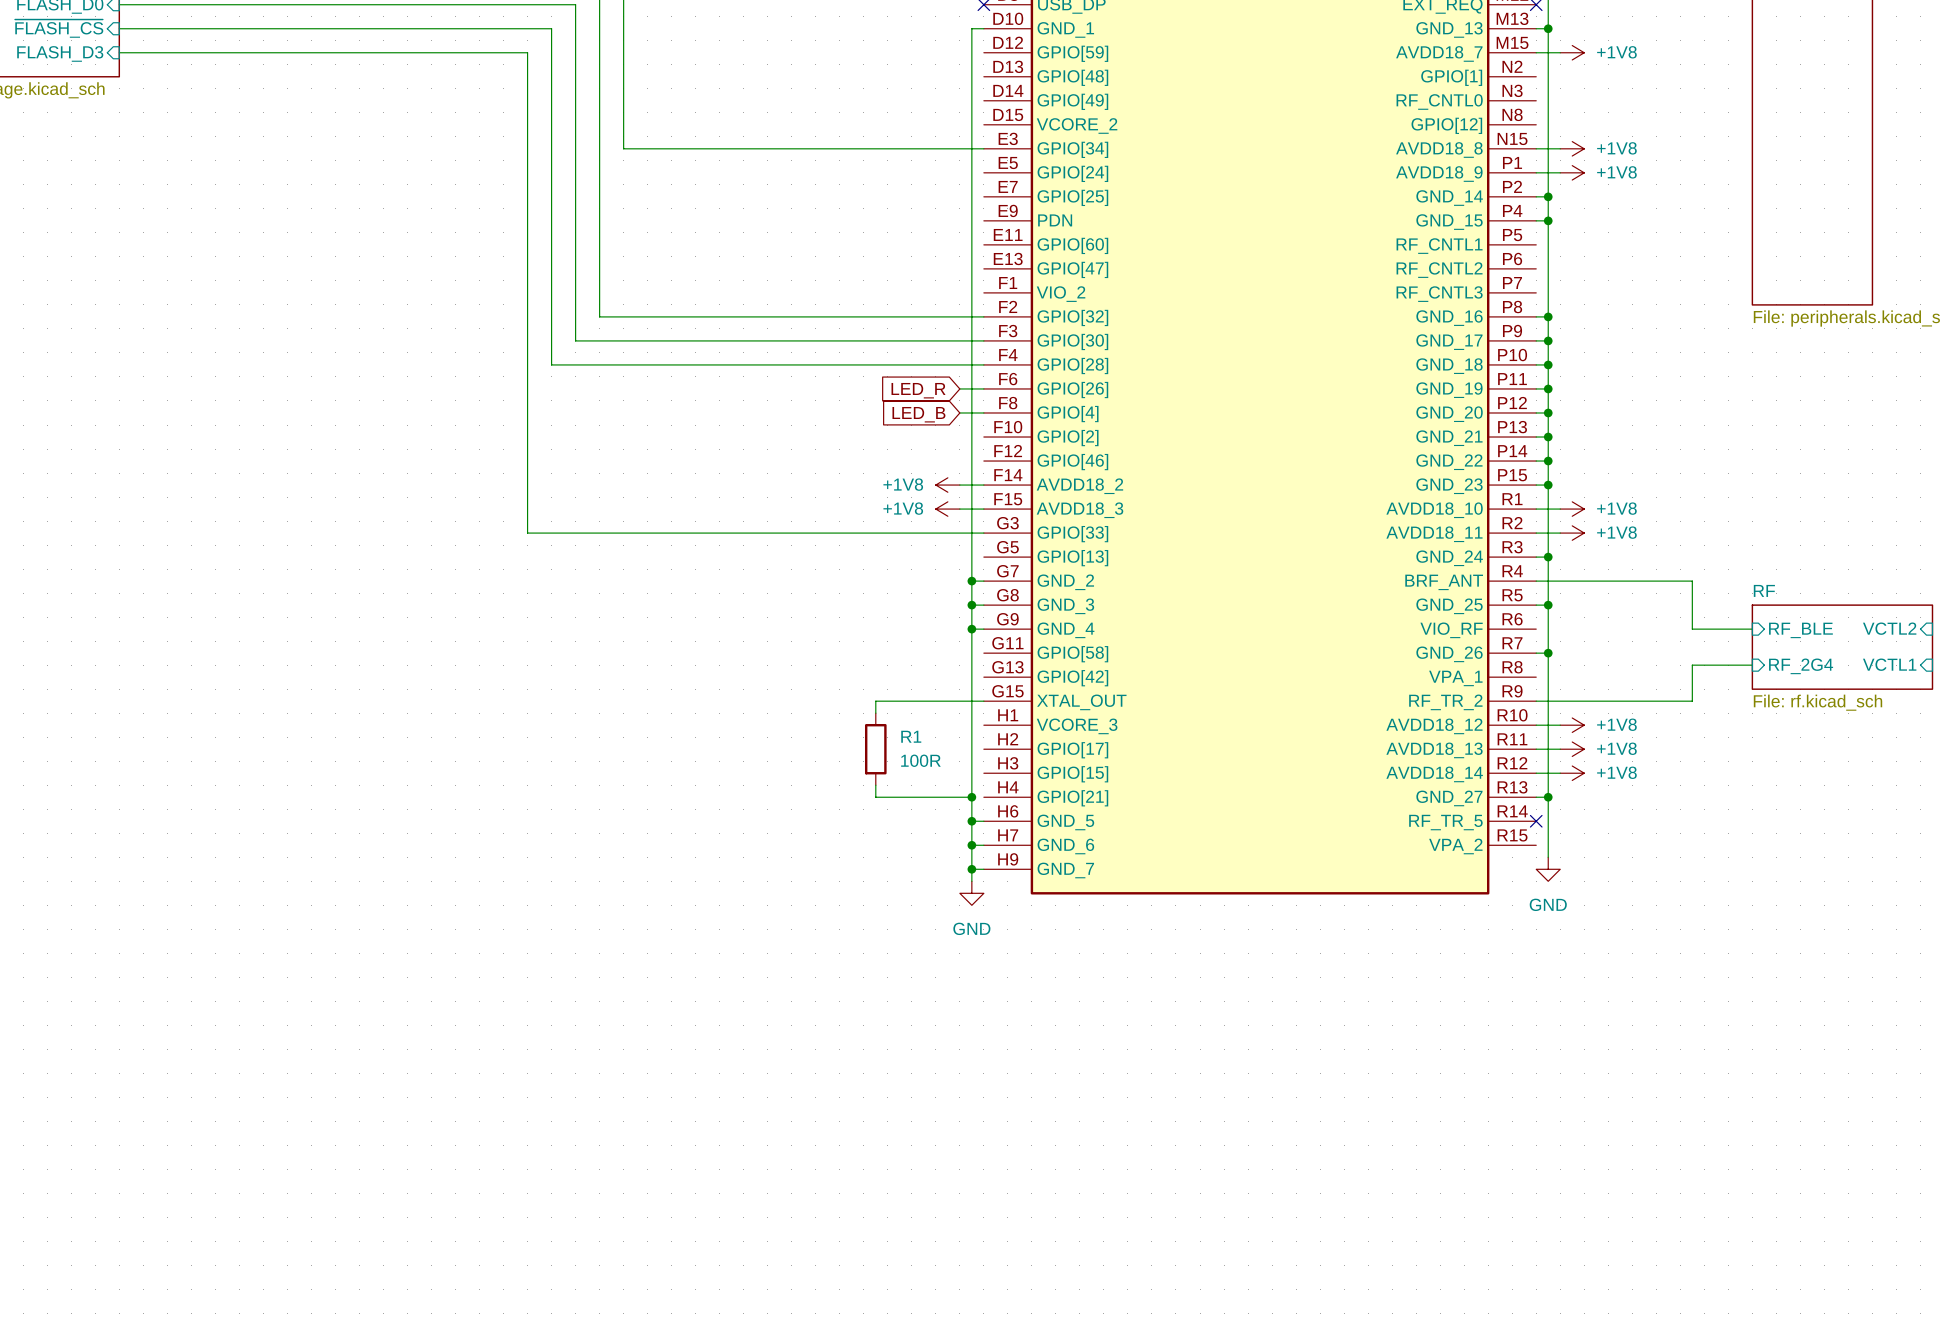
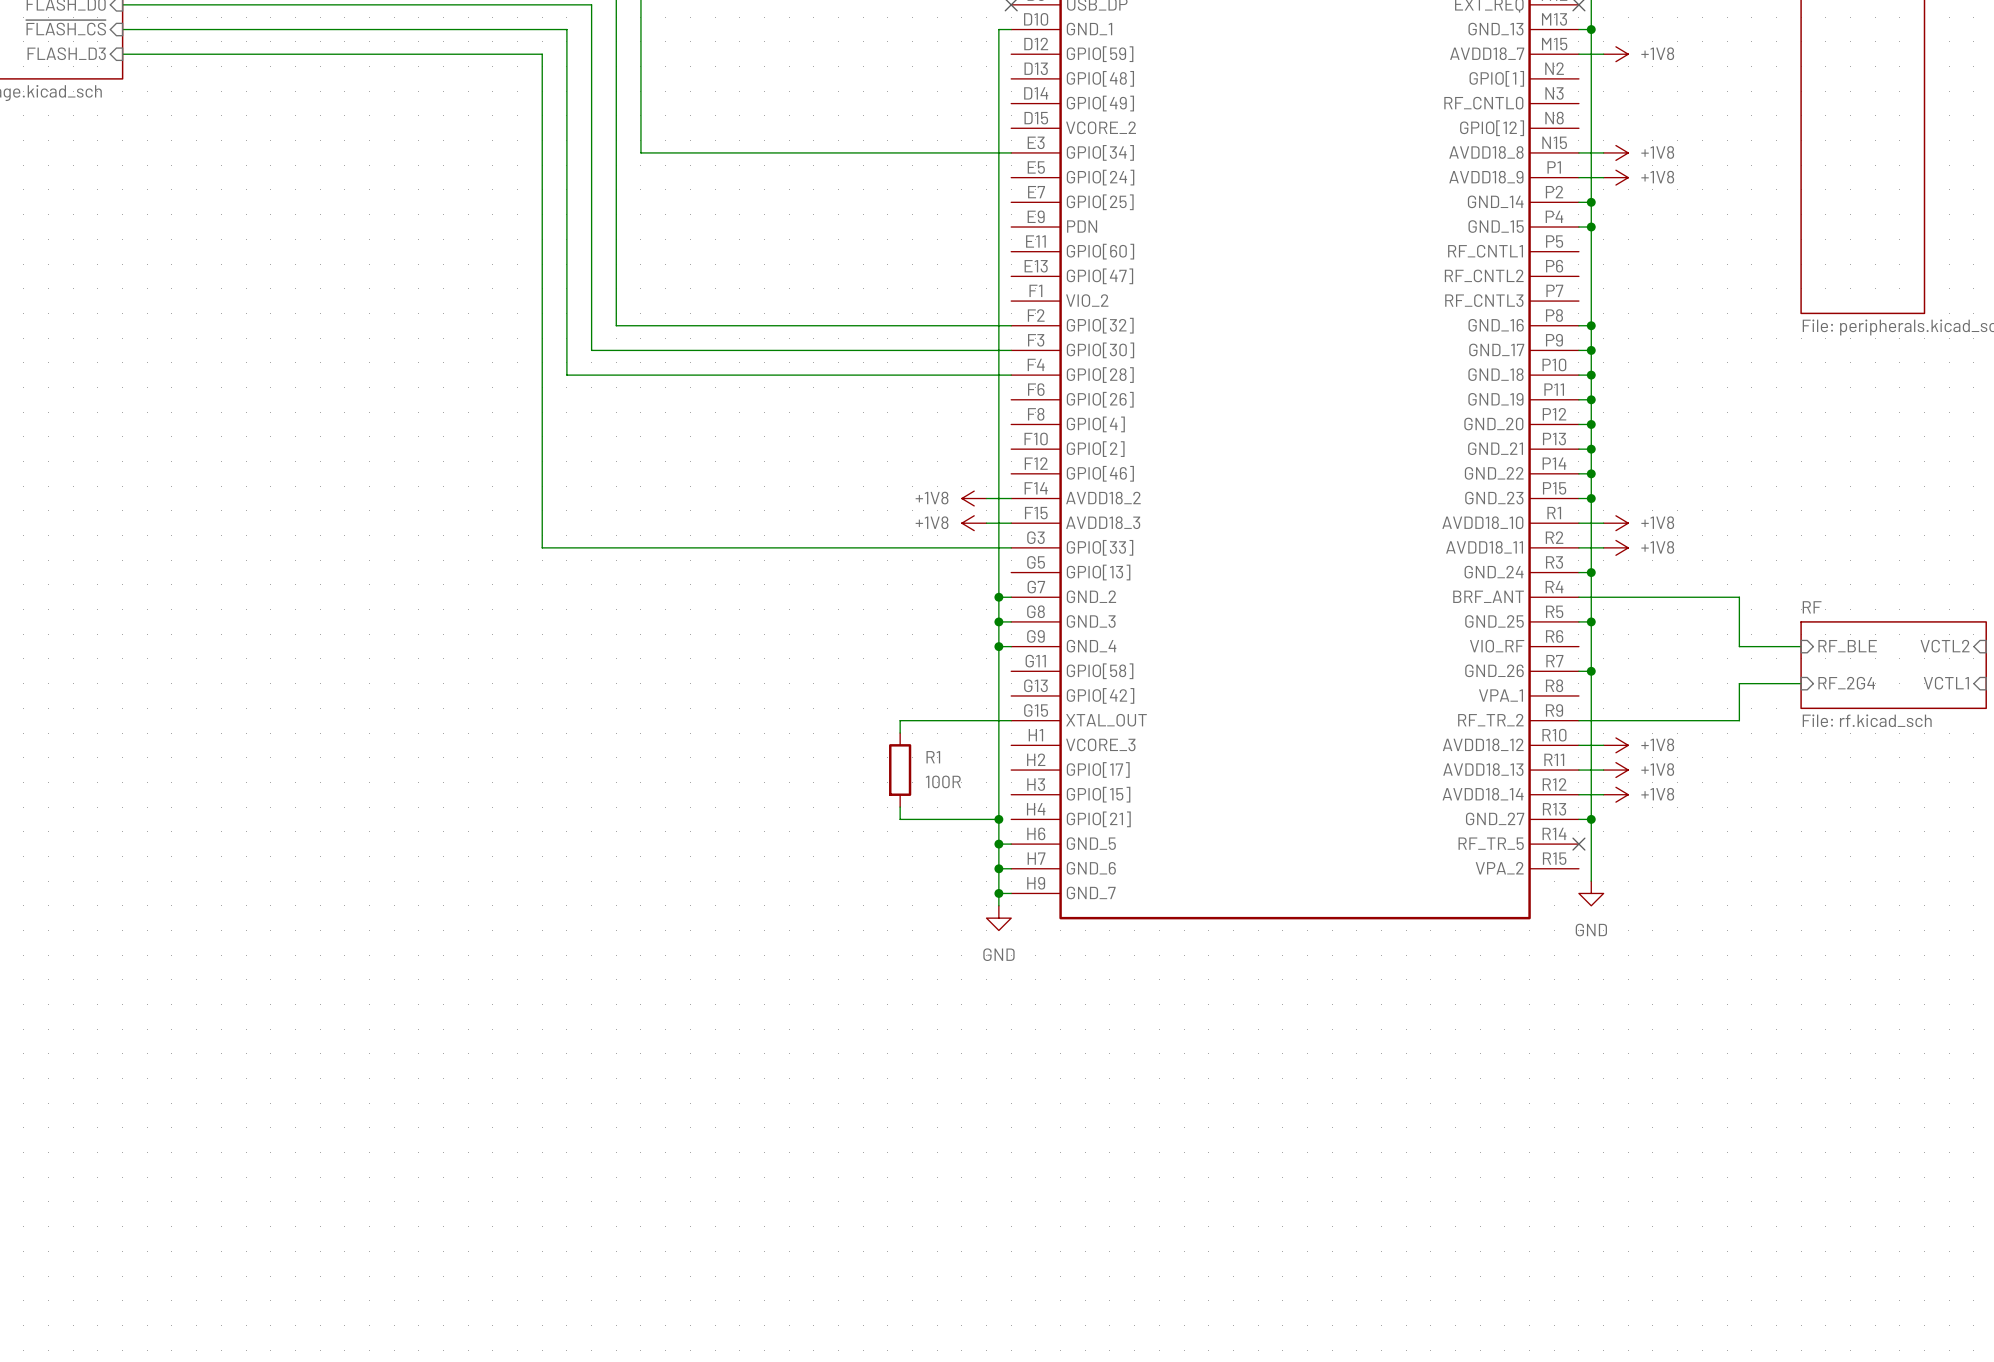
wire: (959, 388) (983, 388) -> none
global label: LED_R (918, 390) -> none
wire: (959, 412) (983, 412) -> none
global label: LED_B (918, 414) -> none

